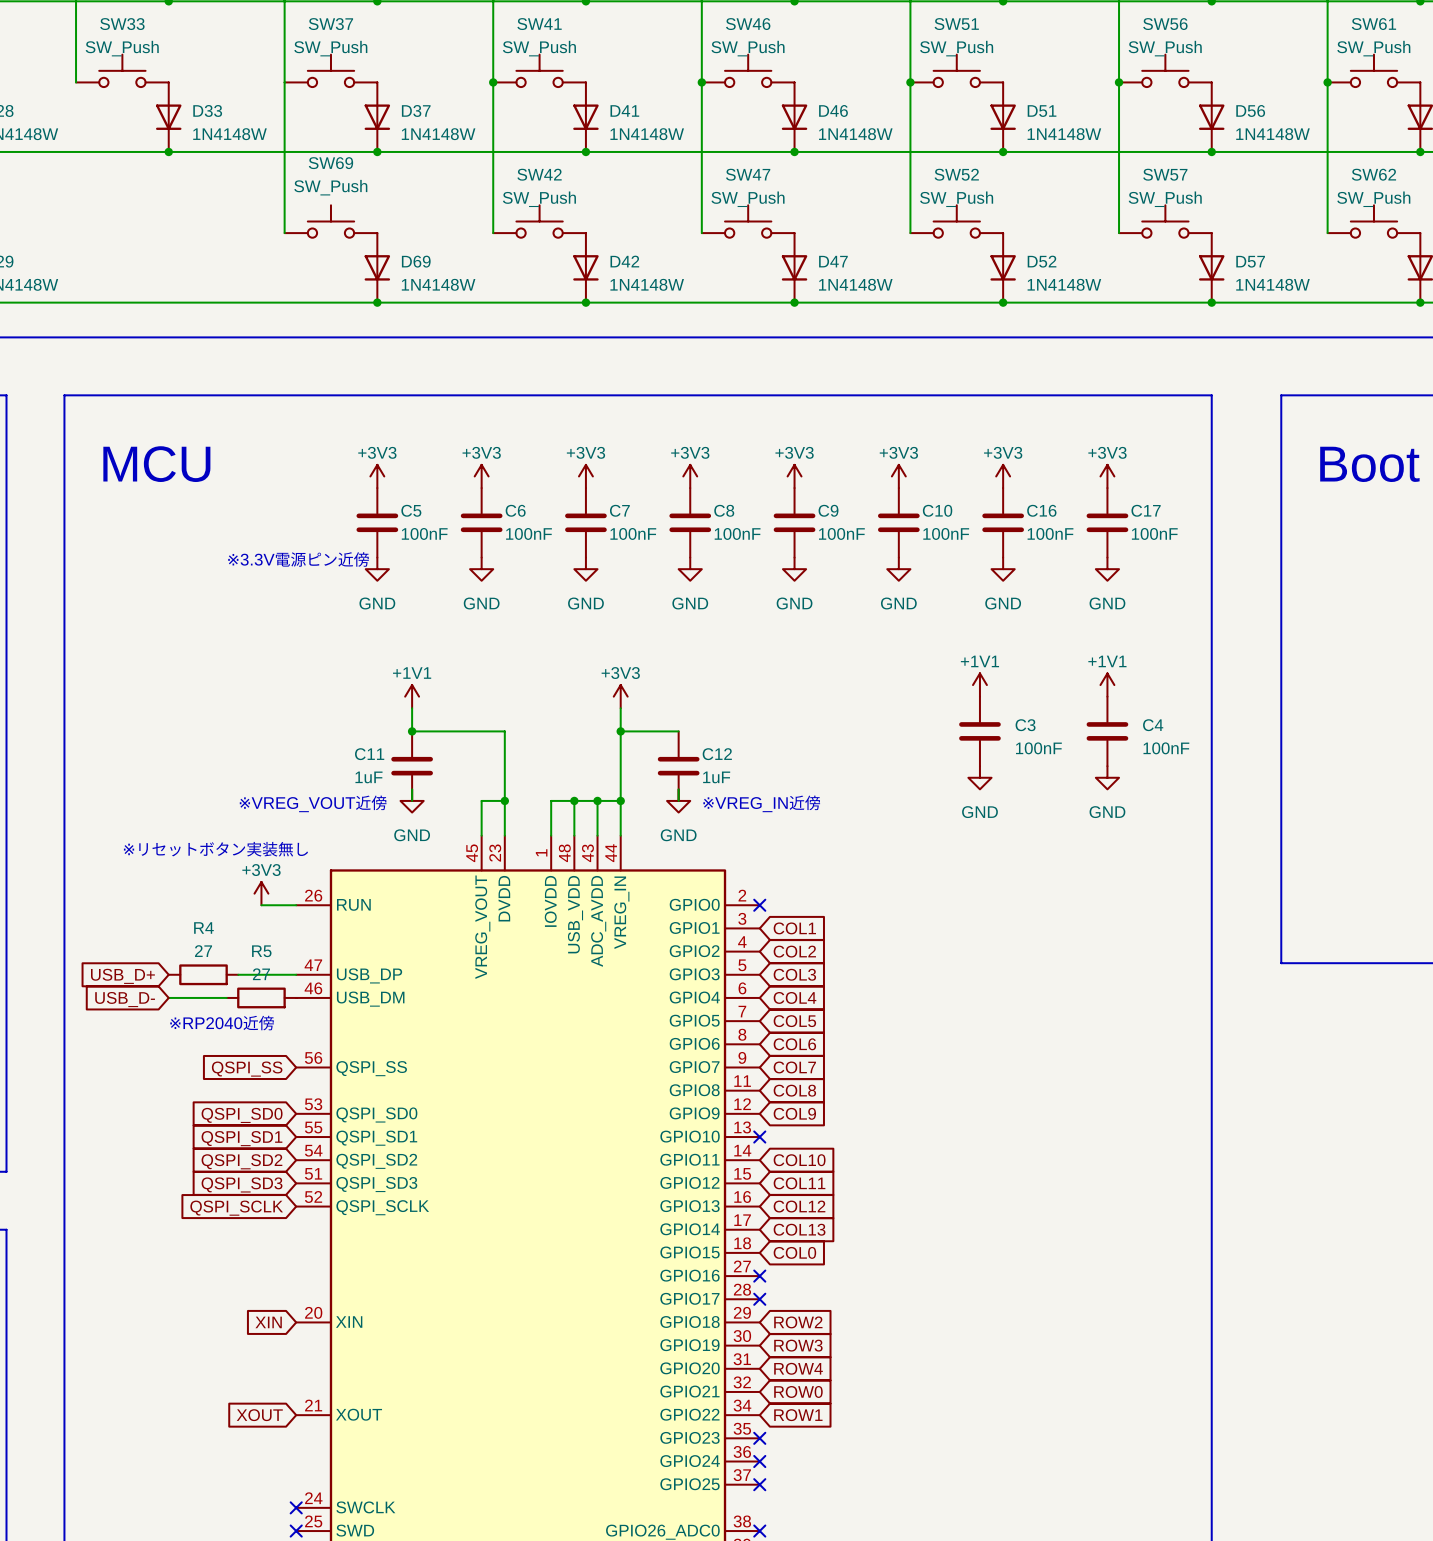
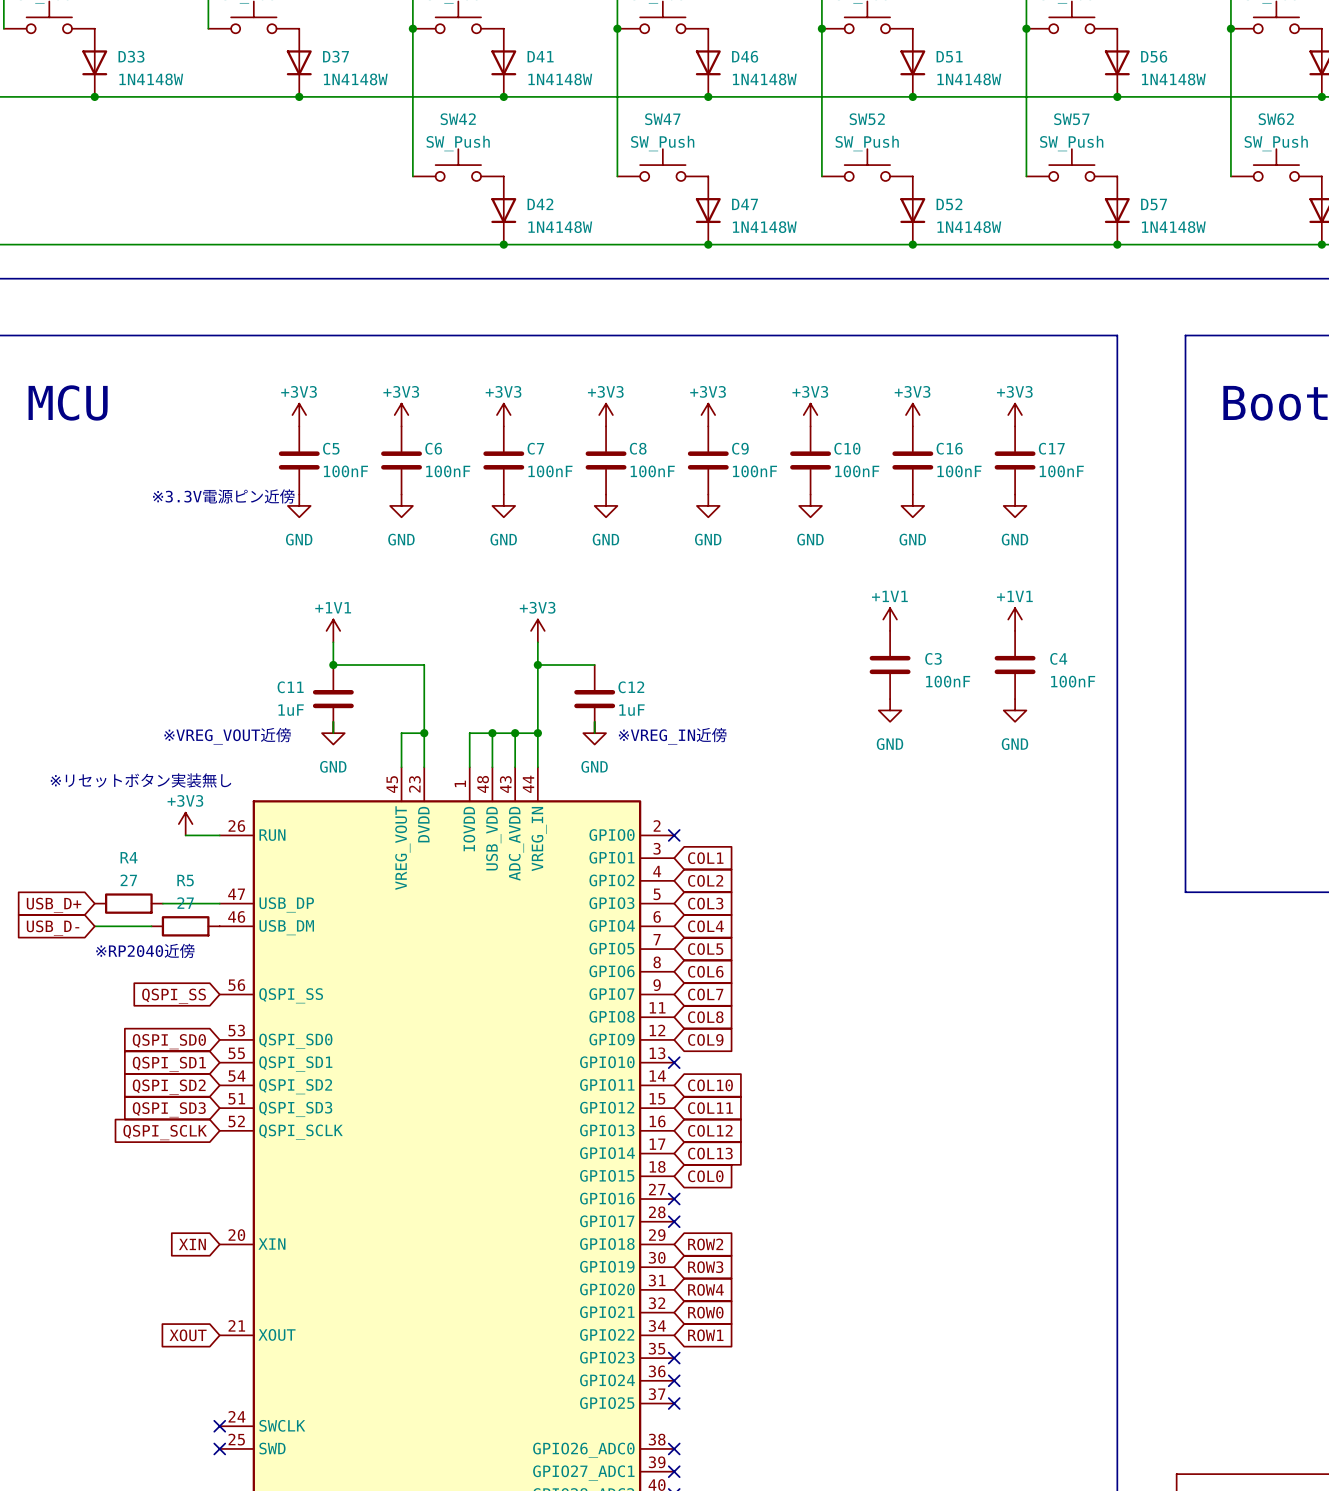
wire: (284, 82) (284, 233) -> none
SW69: SW_Push (330, 221) -> none
D69: 1N4148W (377, 267) -> none
junction: (377, 302) -> none

